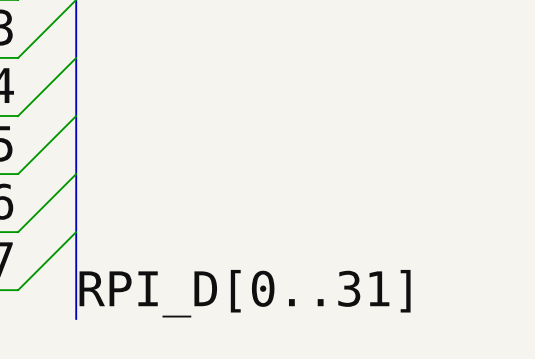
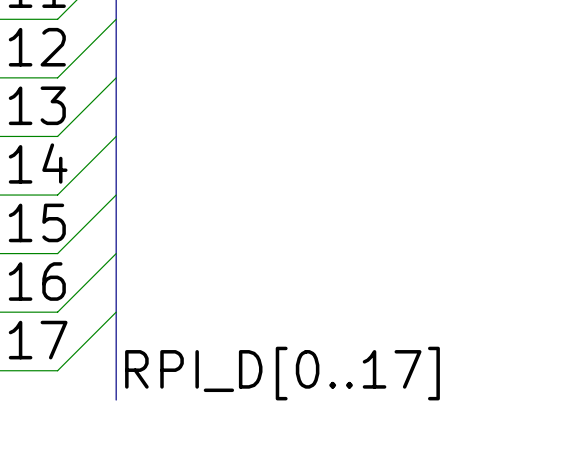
label: RPI_D[0..31] (245, 293) -> RPI_D[0..17] (282, 373)

